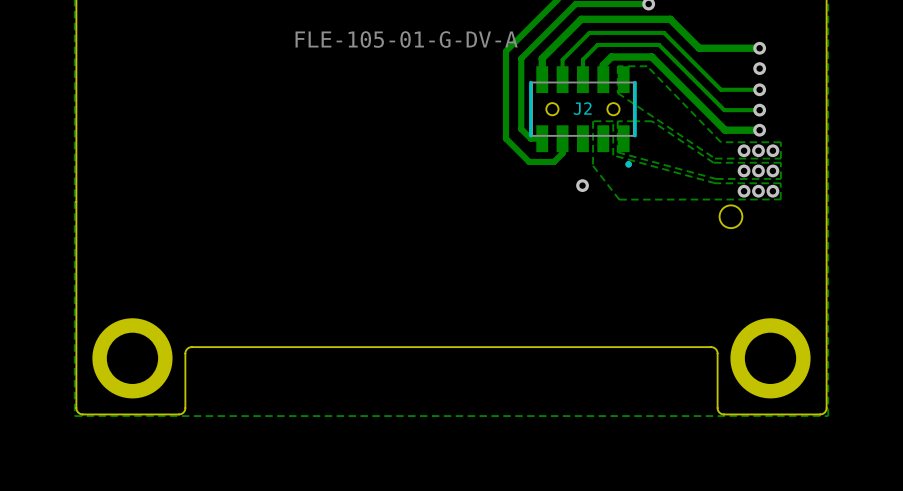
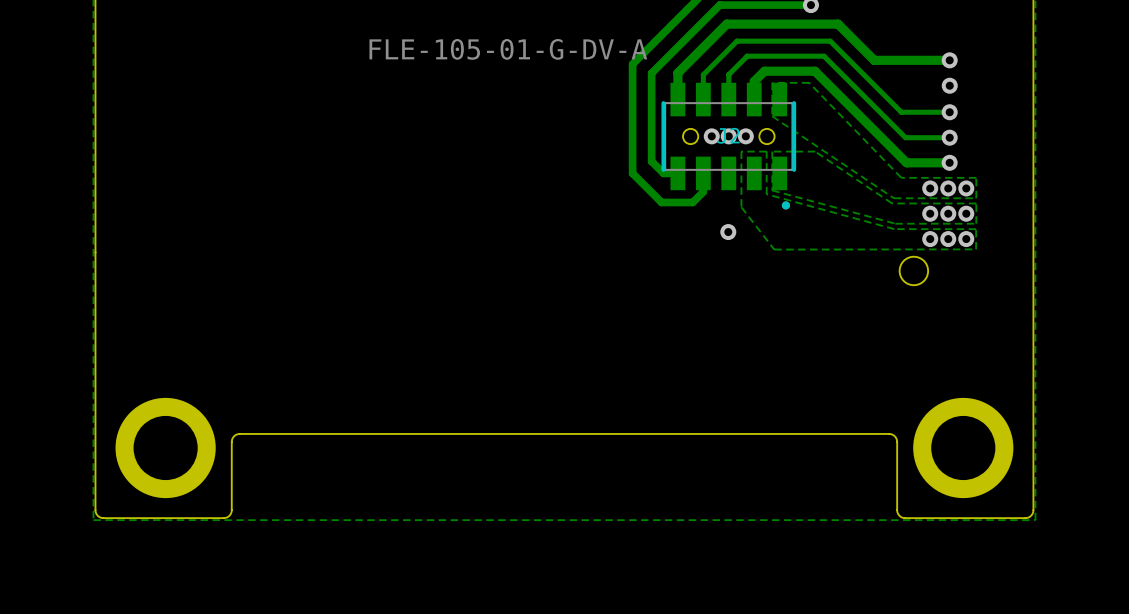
via: none -> (711, 136)
via: none -> (728, 136)
via: none -> (745, 136)

